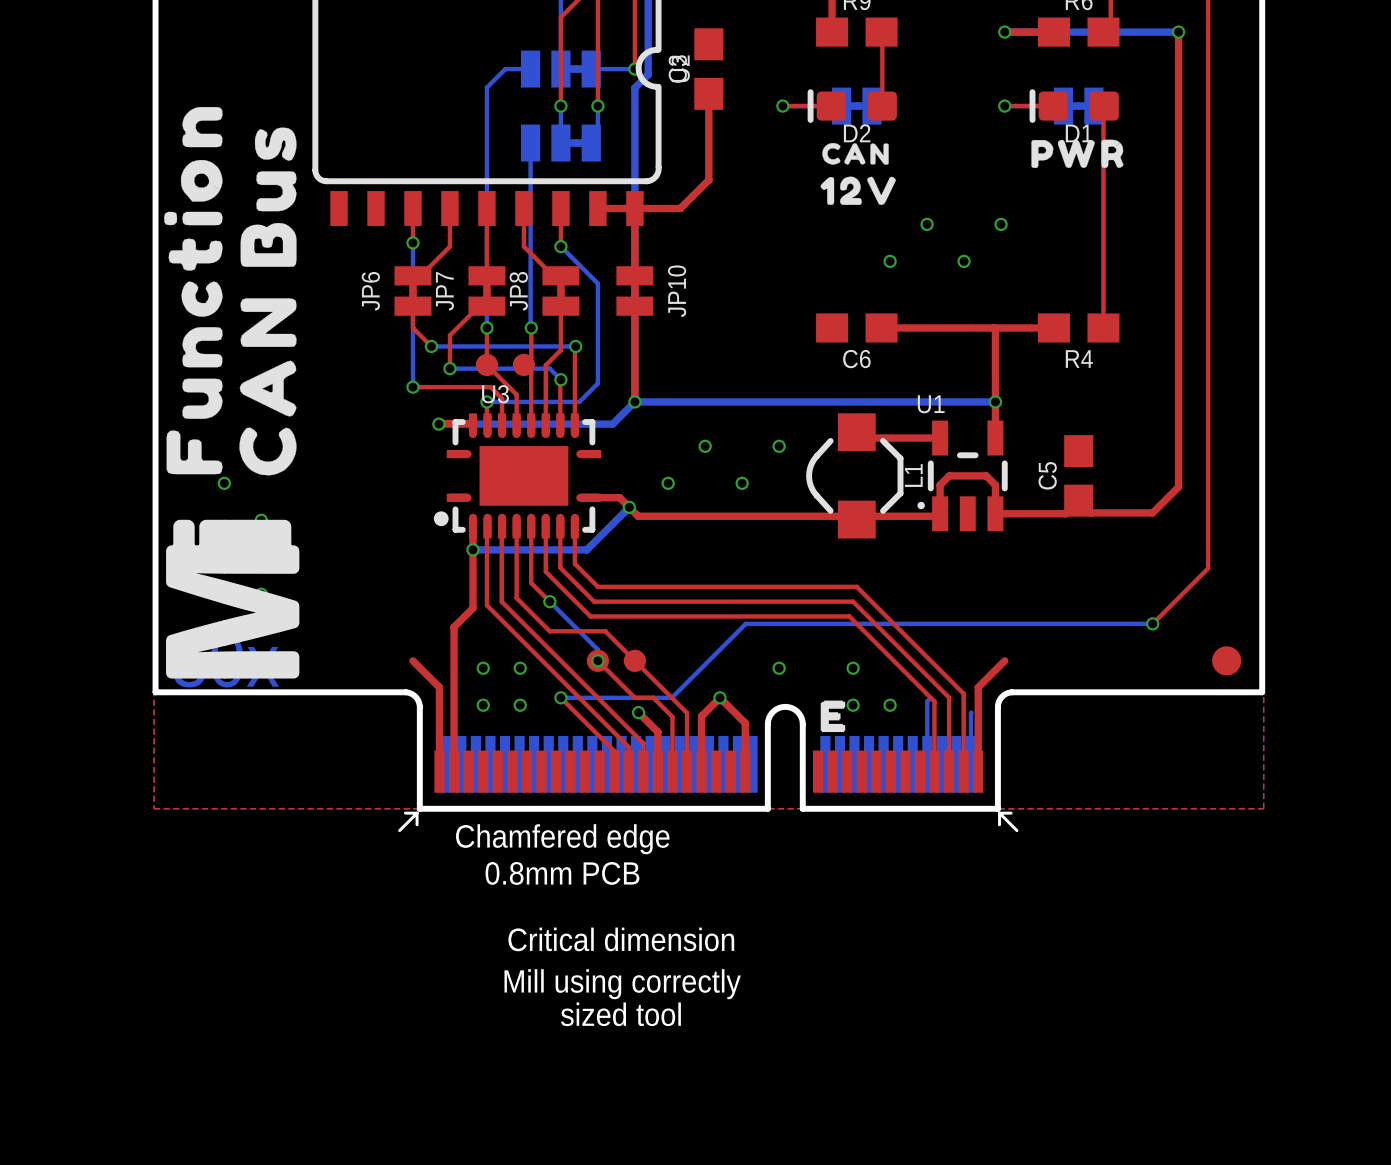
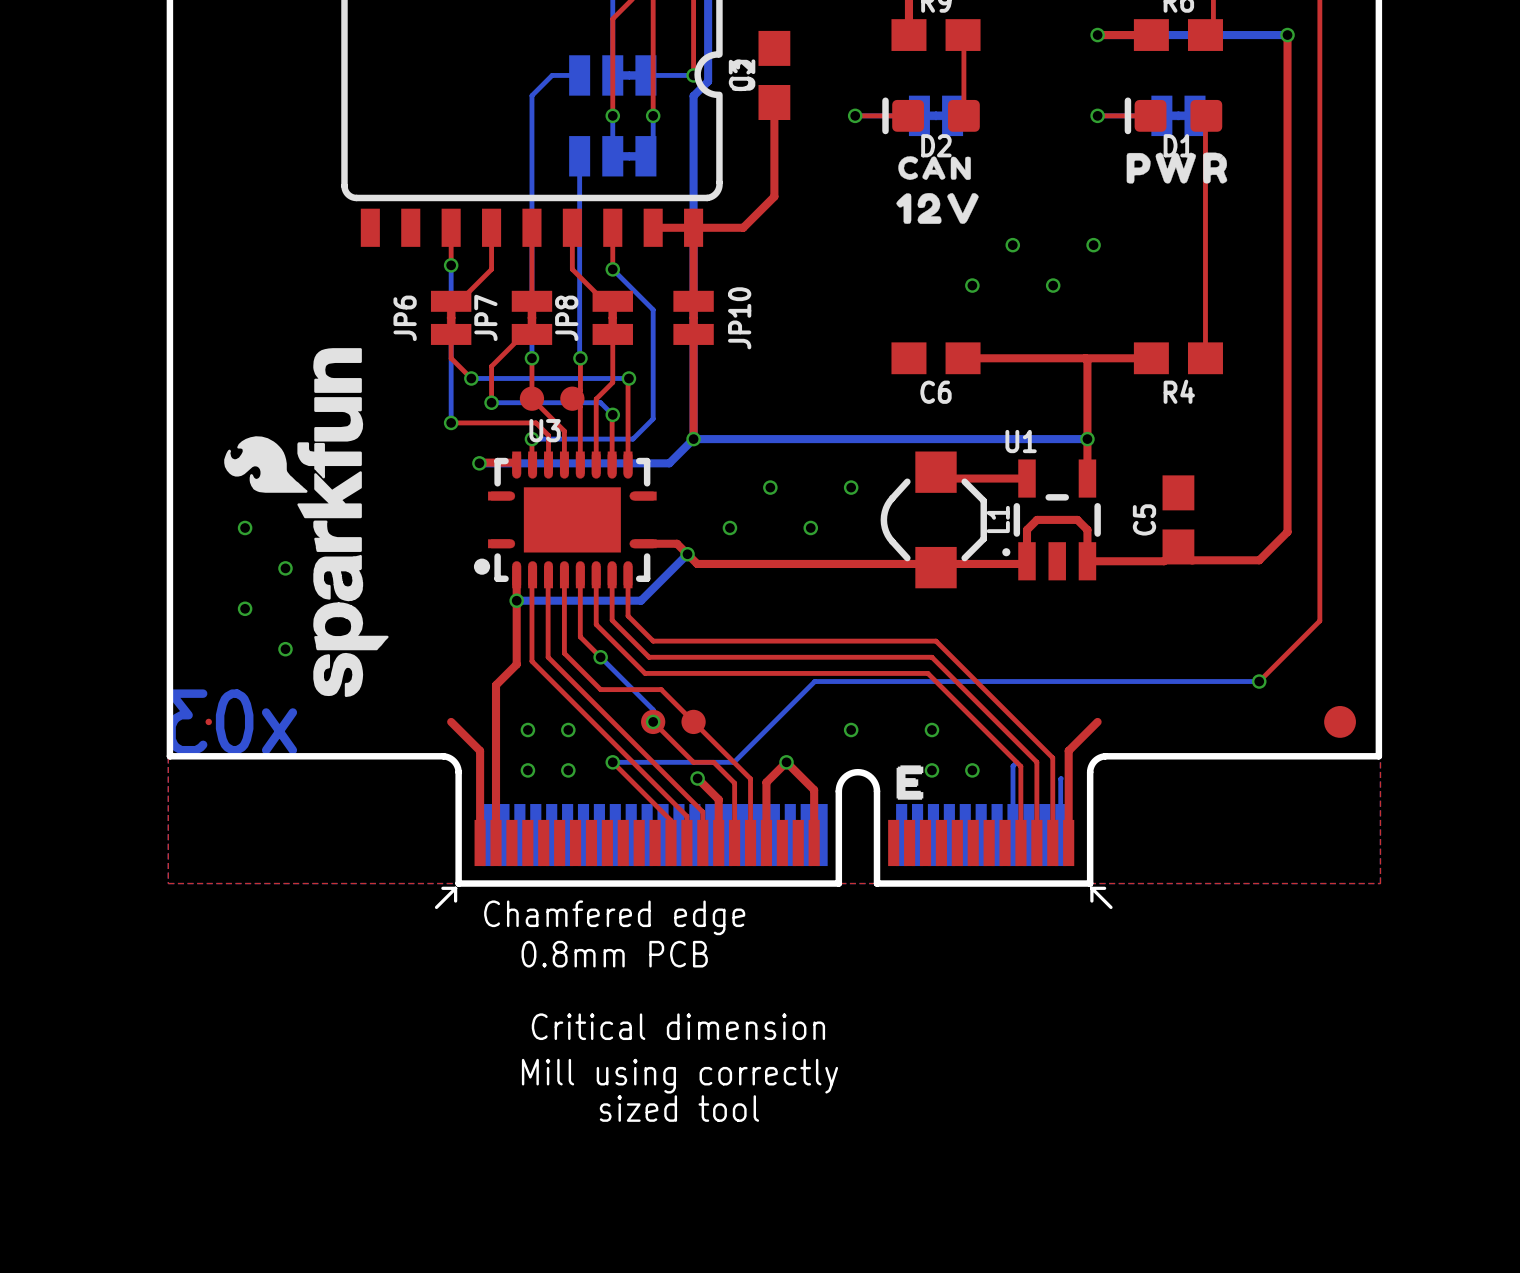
drawing: [164, 106, 297, 476] -> none
drawing: none -> [224, 348, 389, 698]
drawing: [166, 519, 300, 679] -> none

